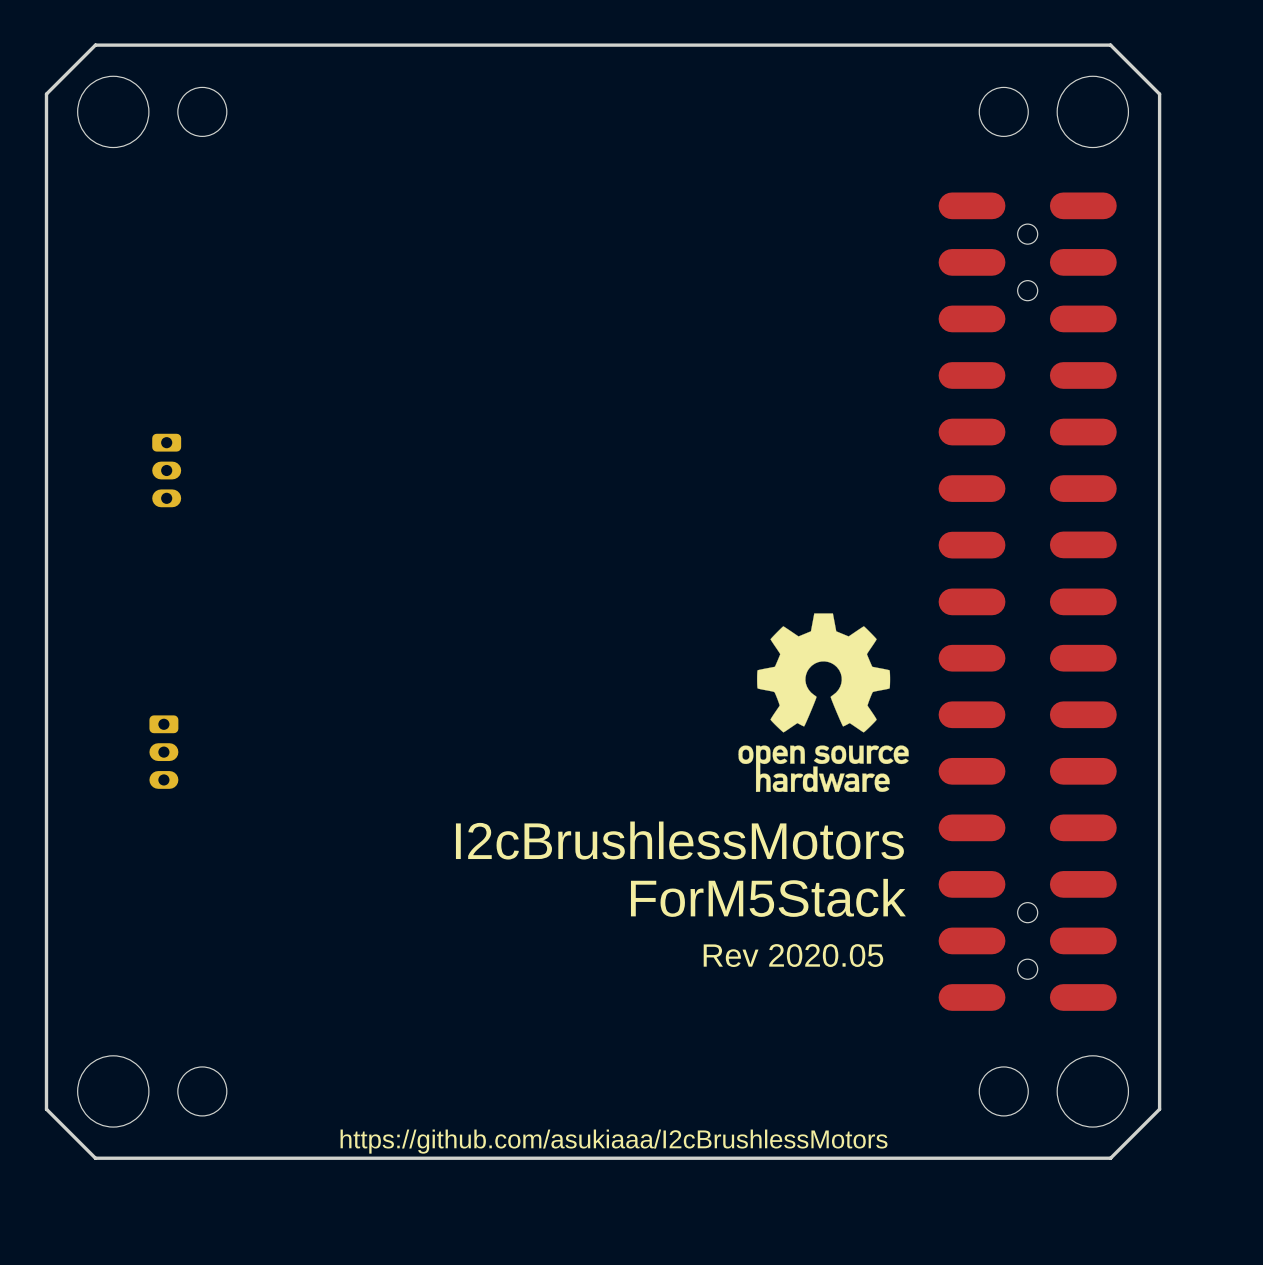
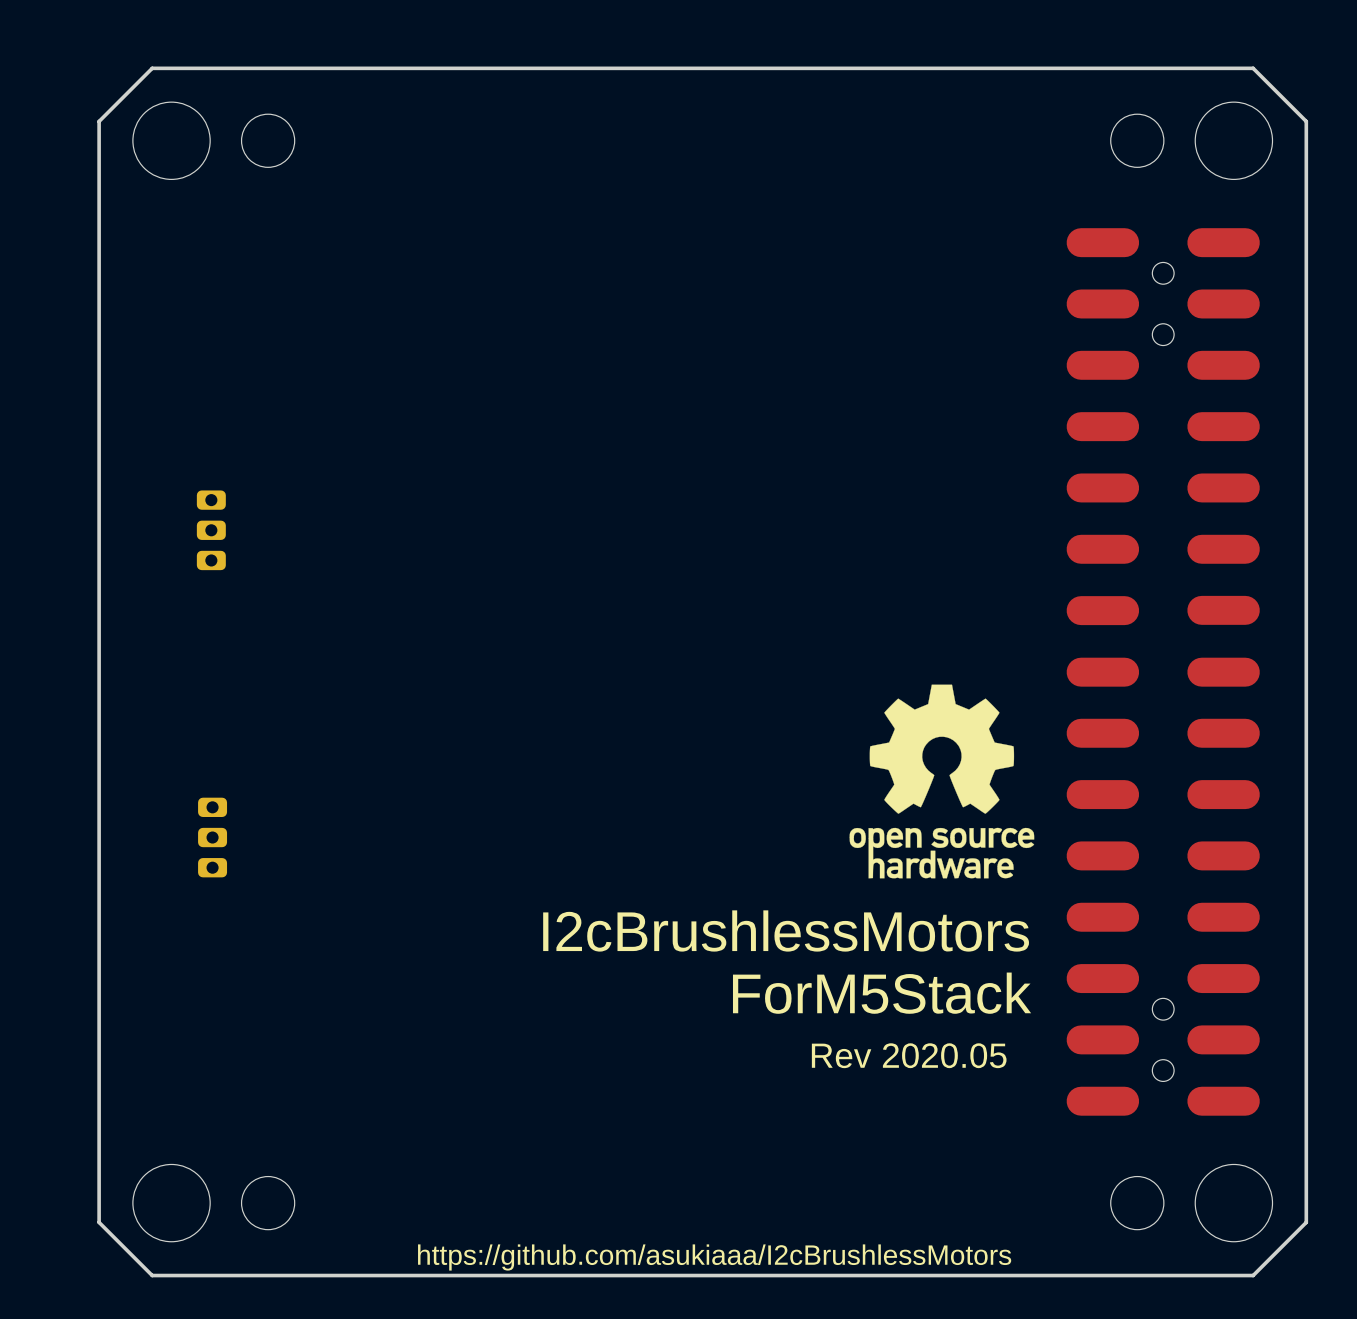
part footprint: [152, 433, 182, 508] -> [196, 490, 226, 571]
part footprint: [149, 715, 179, 789] -> [198, 797, 228, 878]

